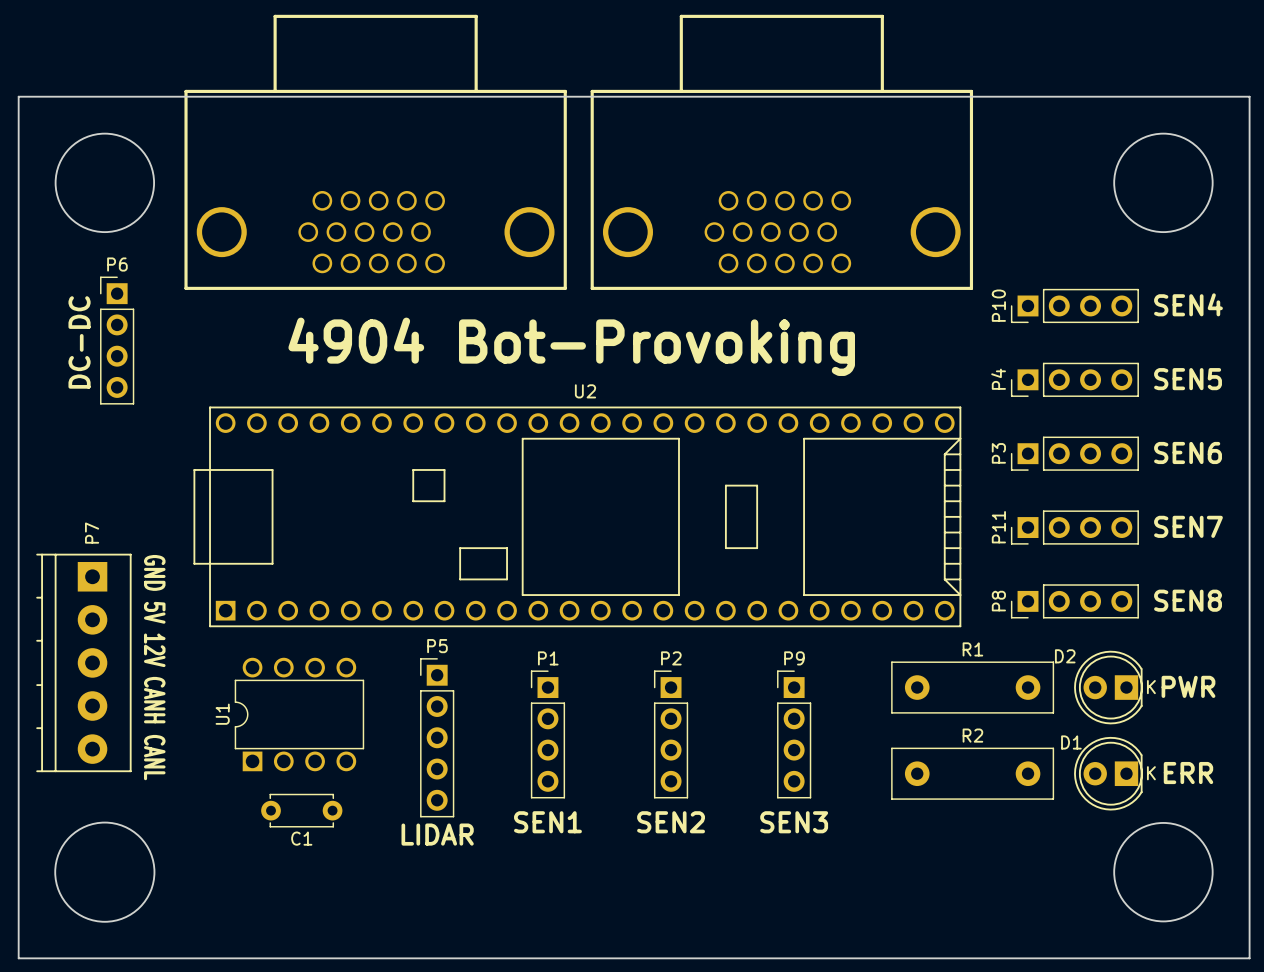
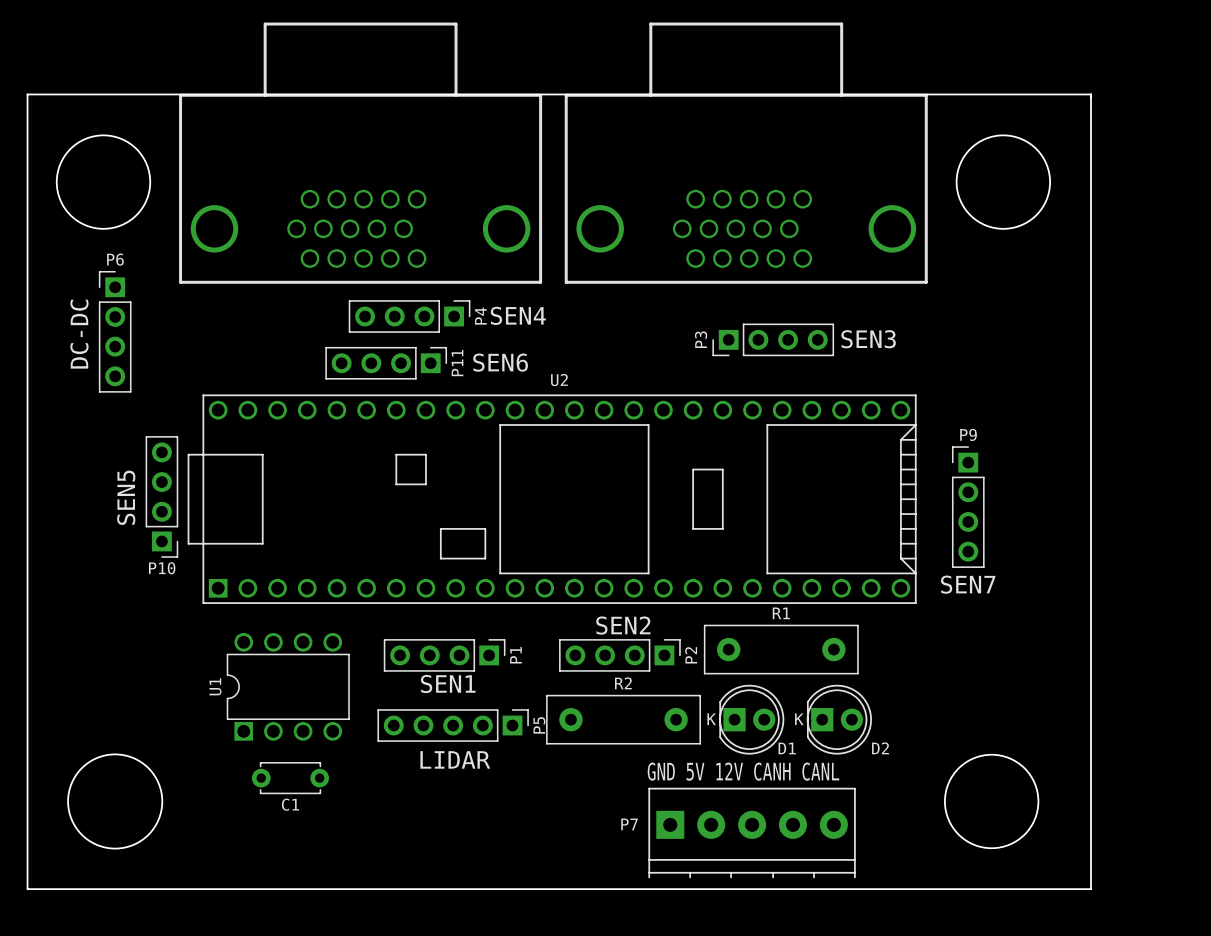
board edge: (18, 96) (18, 958) (1249, 958) (1249, 96) (18, 96) -> (27, 94) (27, 889) (1090, 889) (1090, 94) (27, 94)
round board edge position: (1163, 182) -> (1003, 182)
text: SEN4 (1188, 304) -> none
P10 rotation: 0° (1074, 305) -> 90° counterclockwise (161, 496)
P10 position: (1074, 305) -> (161, 496)
text: none -> SEN4 (518, 315)
text: 4904 Bot-Provoking (571, 346) -> none
text: none -> SEN3 (868, 339)
text: none -> SEN6 (500, 362)
P4 rotation: 0° (1074, 379) -> 180° (409, 316)
P4 position: (1074, 379) -> (409, 316)
text: SEN5 (1188, 379) -> none
text: SEN6 (1188, 452) -> none
P3 position: (1074, 453) -> (773, 339)
text: none -> SEN5 (126, 497)
text position: SEN7 (1188, 526) -> SEN7 (968, 584)
P11 rotation: 0° (1074, 527) -> 180° (386, 363)
P11 position: (1074, 527) -> (386, 363)
text: SEN8 (1188, 600) -> none
P8: (1074, 601) -> none
P7 rotation: 0° (83, 662) -> 90° counterclockwise (752, 833)
P7 position: (83, 662) -> (752, 833)
text: GND 5V 12V CANH CANL (154, 667) -> none
text: PWR (1188, 686) -> none
R1 position: (972, 687) -> (781, 649)
D2 rotation: 0° (1108, 687) -> 180° (839, 719)
D2 position: (1108, 687) -> (839, 719)
P1 rotation: 0° (547, 734) -> 90° clockwise (444, 655)
P1 position: (547, 734) -> (444, 655)
P2 rotation: 0° (671, 734) -> 90° clockwise (619, 655)
P9 position: (794, 734) -> (968, 507)
P5 rotation: 0° (437, 737) -> 90° clockwise (453, 725)
R2 position: (972, 773) -> (623, 719)
D1 rotation: 0° (1108, 773) -> 180° (751, 719)
D1 position: (1108, 773) -> (751, 719)
text: ERR (1188, 773) -> none
text: none -> GND 5V 12V CANH CANL (743, 771)
text position: SEN1 (547, 822) -> SEN1 (448, 683)
text position: SEN2 (671, 822) -> SEN2 (623, 625)
text: SEN3 (794, 822) -> none
text position: LIDAR (437, 834) -> LIDAR (455, 759)
round board edge position: (104, 872) -> (115, 801)
round board edge position: (1163, 872) -> (991, 801)

